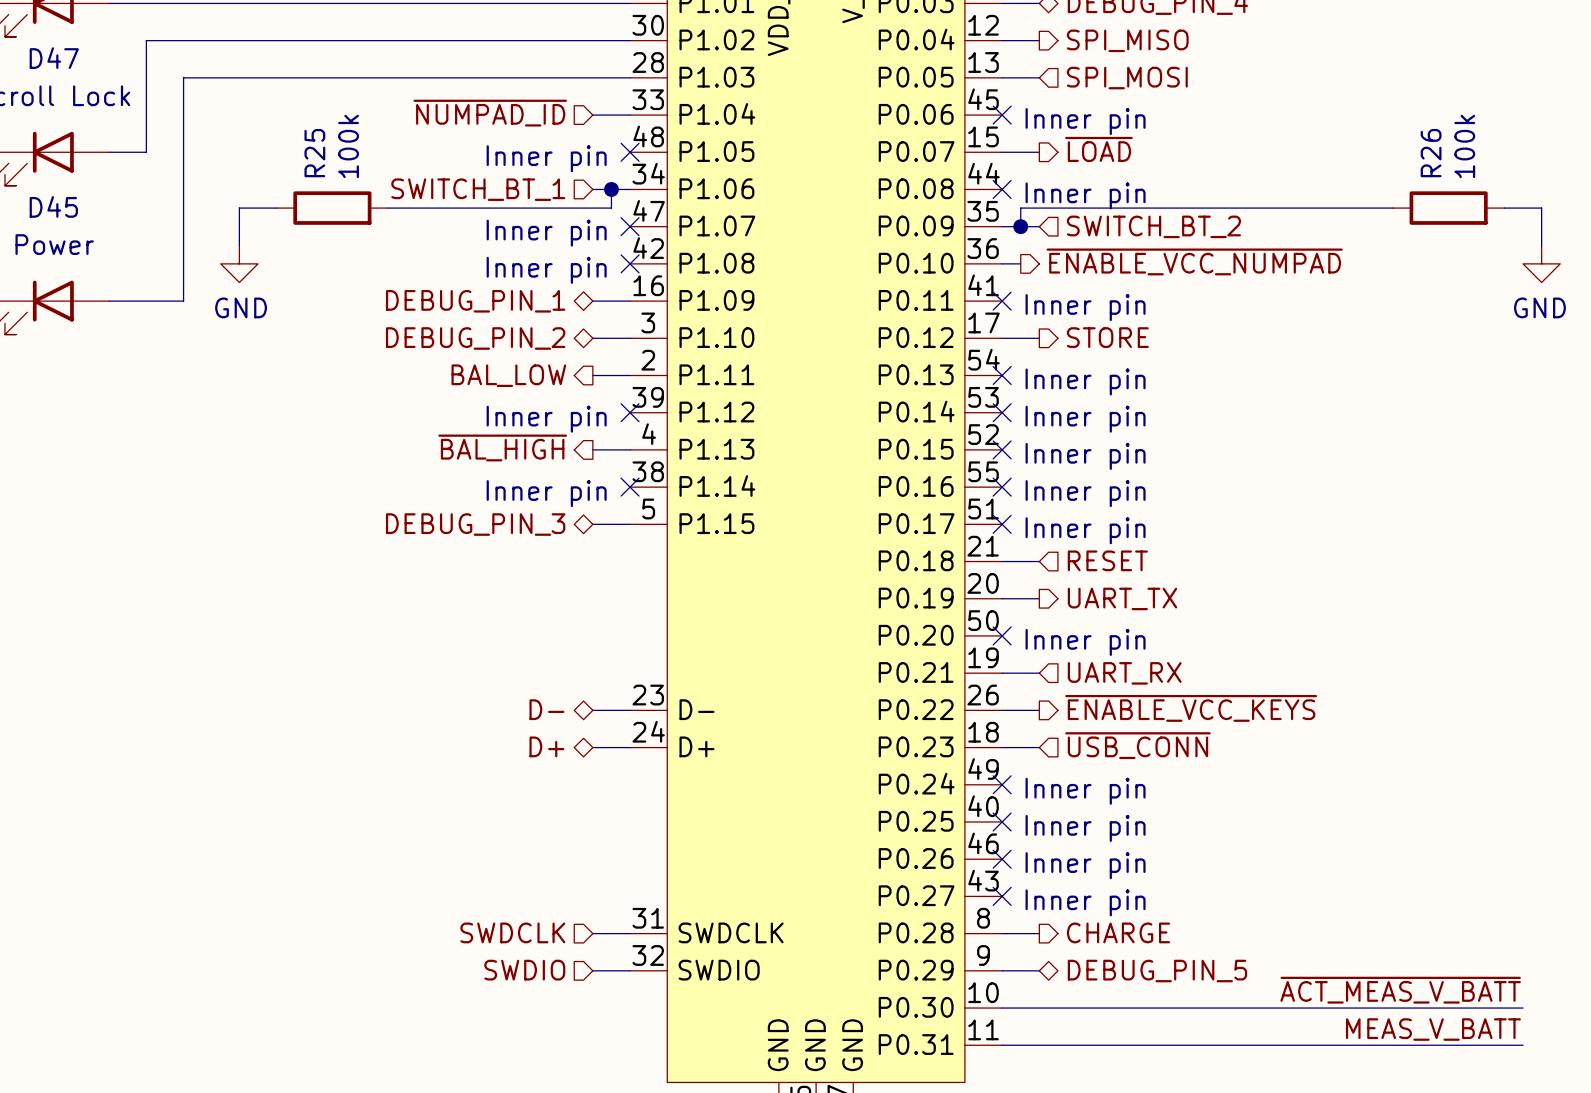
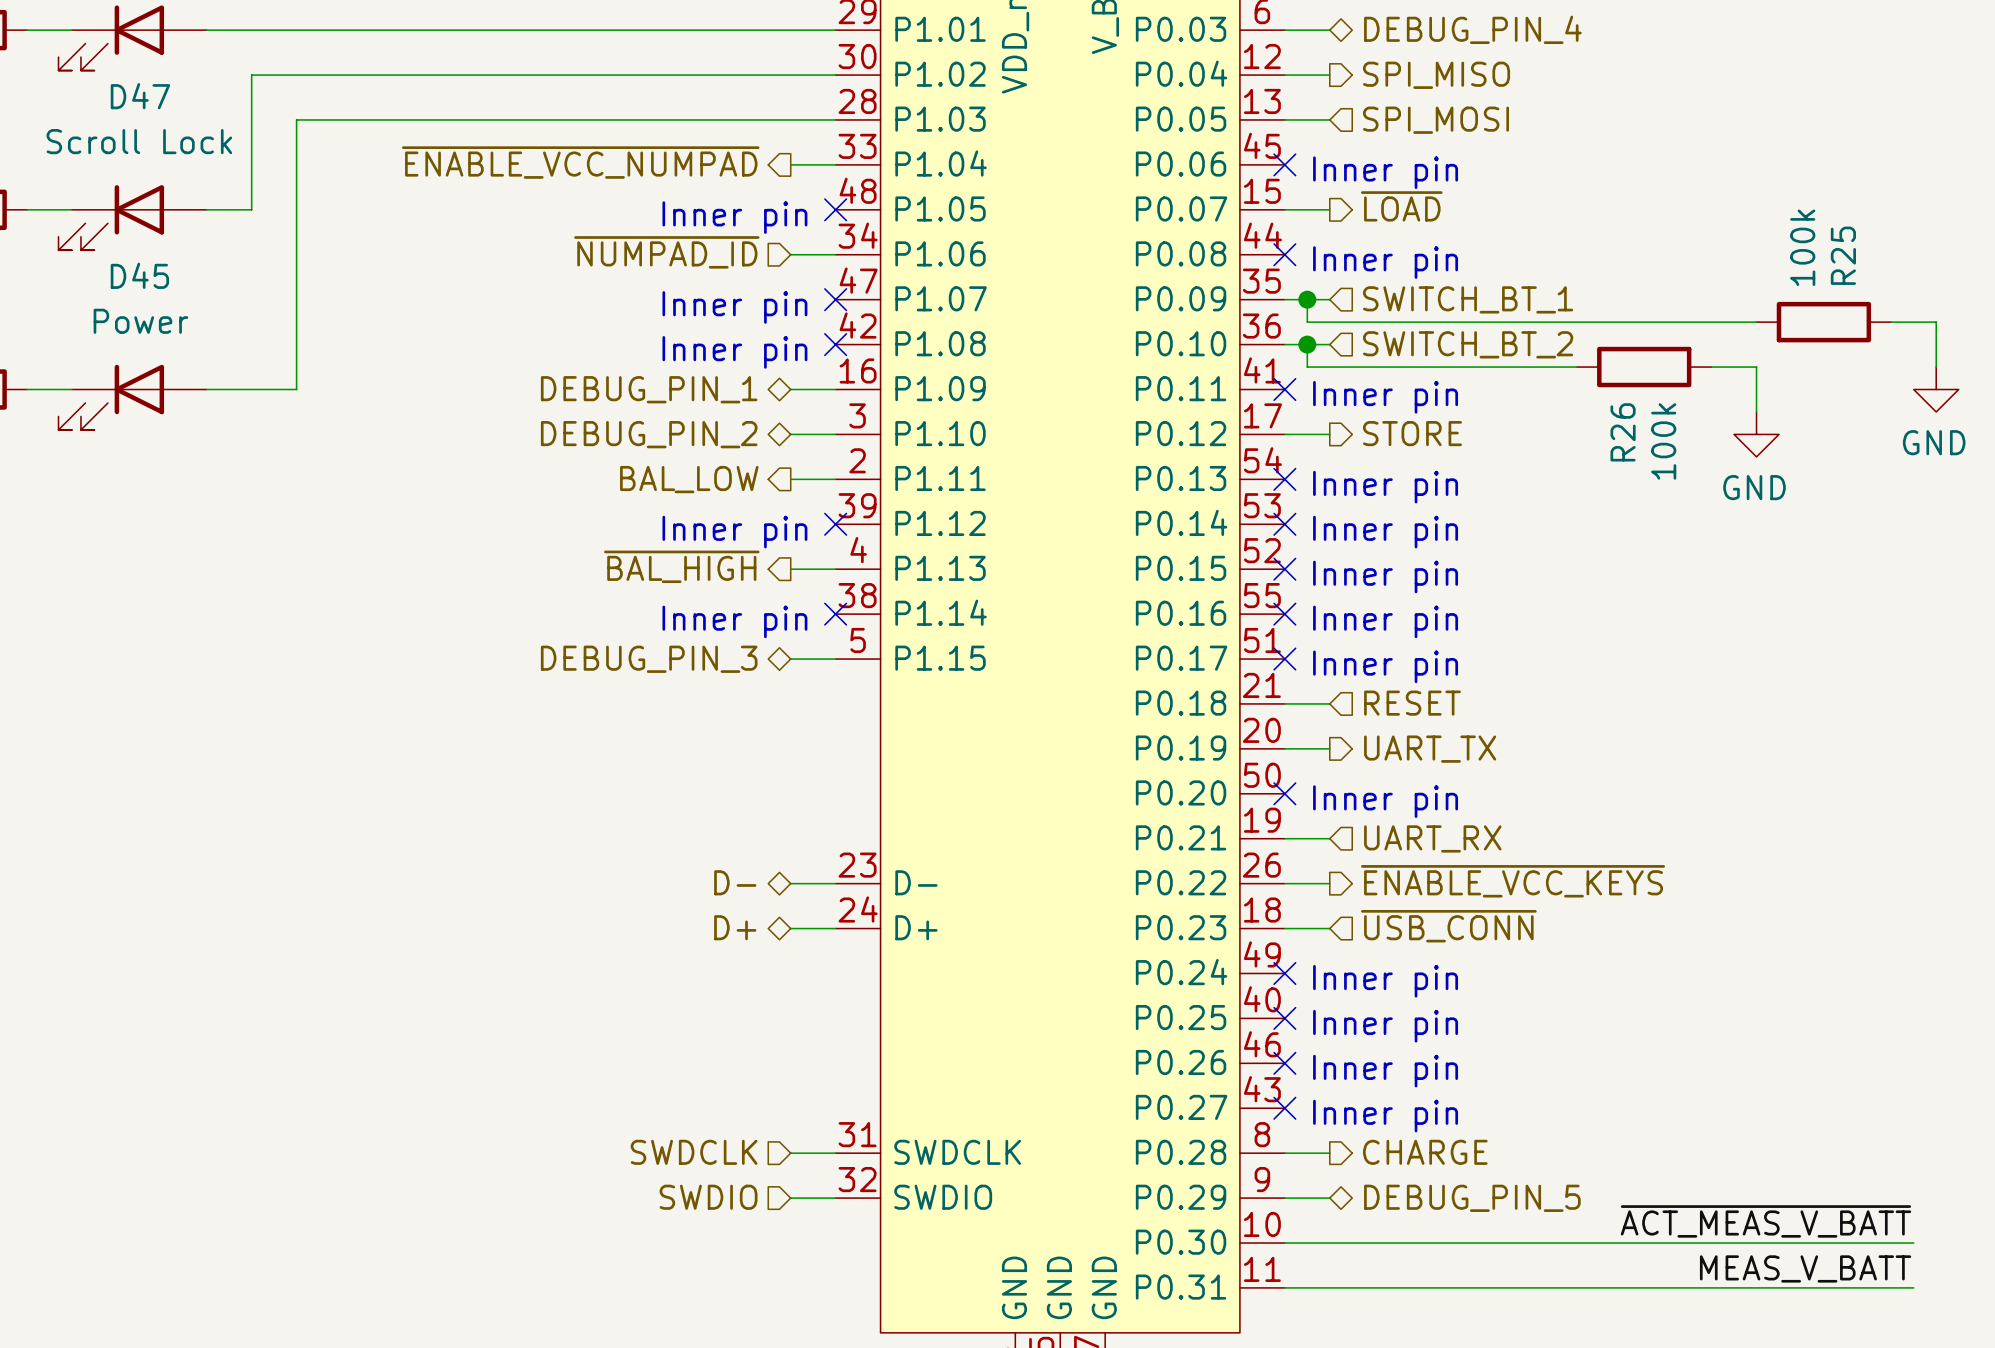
hierarchical label shape: input (490, 113) -> output (580, 162)
hierarchical label: ~{NUMPAD_ID} (490, 113) -> ~{ENABLE_VCC_NUMPAD} (580, 162)
R25 value position: 100k (348, 146) -> 100k (1802, 247)
R26 value position: 100k (1464, 146) -> 100k (1663, 441)
R25 name position: R25 (314, 153) -> R25 (1843, 255)
R26 name position: R26 (1431, 153) -> R26 (1623, 432)
hierarchical label: SWITCH_BT_1 (478, 189) -> ~{NUMPAD_ID} (666, 252)
wire: (611, 189) (611, 208) (388, 208) -> none
junction: (611, 189) -> none
wire: (276, 208) (239, 208) (239, 245) -> none
R25 position: (332, 208) -> (1823, 322)
wire: (1392, 208) (1020, 208) (1020, 226) -> (1756, 322) (1307, 322) (1307, 299)
R26 position: (1448, 208) -> (1644, 367)
wire: (1504, 208) (1541, 208) (1541, 245) -> (1891, 322) (1936, 322) (1936, 367)
hierarchical label: SWITCH_BT_2 (1153, 226) -> SWITCH_BT_1 (1468, 299)
hierarchical label: ~{ENABLE_VCC_NUMPAD} (1194, 261) -> none
power symbol: GND (239, 263) -> none
junction: none -> (1307, 344)
wire: none -> (1329, 344) (1307, 344) (1307, 367) (1576, 367)
power symbol position: GND (1541, 263) -> GND (1936, 389)
hierarchical label: none -> SWITCH_BT_2 (1468, 344)
wire: none -> (1711, 367) (1756, 367) (1756, 411)
power symbol: none -> GND (1756, 434)

